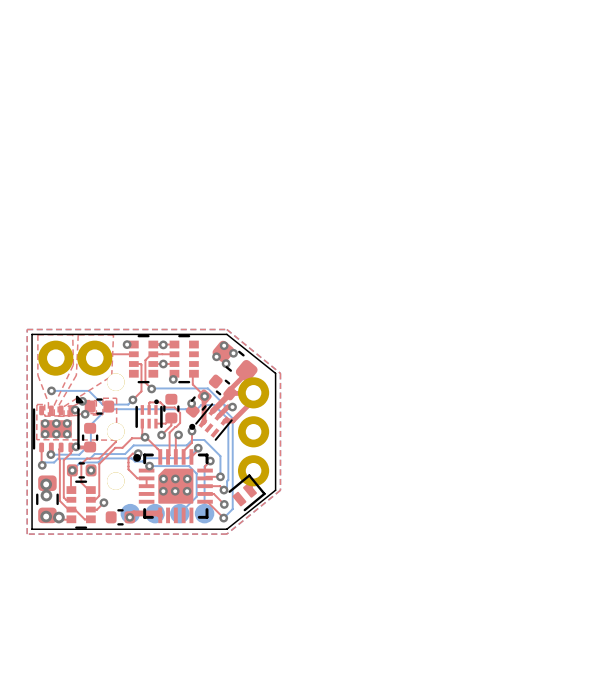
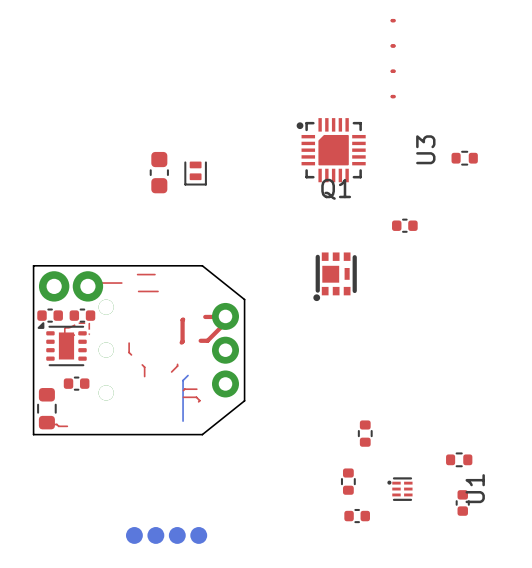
part: none -> (393, 20)
part: none -> (393, 45)
part: none -> (393, 71)
part: none -> (393, 96)
U3: none -> (331, 150)
part: none -> (464, 158)
part: none -> (159, 172)
part: none -> (195, 173)
part: none -> (404, 225)
top zone outline: (27, 329) (226, 329) (280, 373) (280, 490) (226, 534) (27, 534) (27, 329) -> none
top zone outline: (37, 334) (37, 375) (48, 402) (48, 415) (54, 415) (54, 405) (73, 364) (72, 334) (37, 334) -> none
top zone outline: (78, 334) (113, 334) (111, 376) (64, 406) (64, 416) (58, 416) (58, 406) (76, 375) (78, 334) -> none
via: (127, 344) -> none
via: (163, 344) -> none
via: (224, 345) -> none
Q1: none -> (335, 276)
via: (233, 353) -> none
top track: (149, 354) (172, 354) -> none
top track: (151, 354) (145, 360) (145, 382) (151, 388) -> none
via: (216, 356) -> none
part: (143, 359) -> none
part: (184, 359) -> none
part: (235, 361) -> none
via: (226, 363) -> none
top track: (133, 364) (141, 364) (141, 391) (132, 399) -> none
via: (163, 364) -> none
top track: (192, 373) (192, 384) (204, 396) (202, 398) -> none
top track: (245, 374) (230, 389) (230, 393) -> none
via: (173, 379) -> none
part: (222, 387) -> none
bottom track: (151, 388) (207, 388) (224, 405) (224, 410) (232, 418) (232, 509) (223, 518) -> none
via: (151, 388) -> none
bottom track: (51, 390) (88, 390) (102, 404) (128, 404) (132, 399) -> none
via: (51, 390) -> none
top track: (230, 393) (212, 411) -> none
via: (204, 396) -> none
top zone outline: (102, 398) (102, 414) (44, 416) (44, 404) (36, 404) (36, 439) (116, 440) (116, 398) (102, 398) -> none
via: (132, 399) -> none
via: (82, 401) -> none
via: (191, 403) -> none
part: (198, 403) -> none
part position: (99, 406) -> (82, 315)
top track: (232, 407) (227, 407) (218, 415) -> none
via: (232, 407) -> none
part: (171, 408) -> none
via: (75, 409) -> none
top track: (149, 409) (149, 402) (160, 402) (165, 407) (174, 407) (180, 412) (180, 423) (169, 432) (168, 456) -> none
bottom track: (220, 411) (214, 405) (201, 405) (194, 411) (188, 411) (186, 409) (106, 409) (90, 424) (90, 443) (79, 454) (50, 454) -> none
bottom track: (220, 411) (228, 419) (228, 480) (227, 486) (222, 490) -> none
part: (149, 413) -> none
via: (85, 414) -> none
part: (210, 422) -> none
via: (45, 423) -> none
via: (56, 423) -> none
part rotation: 0° (58, 423) -> 90° counterclockwise (62, 344)
via: (67, 423) -> none
top track: (155, 423) (165, 423) (171, 417) (171, 425) (160, 434) -> none
top track: (115, 431) (115, 441) (99, 458) (86, 458) (81, 464) (81, 482) (89, 490) (92, 488) -> none
top track: (192, 431) (192, 442) (183, 451) (182, 461) -> none
via: (192, 431) -> none
via: (45, 434) -> none
via: (56, 434) -> none
via: (67, 434) -> none
top track: (178, 434) (175, 437) (175, 456) -> none
via: (178, 434) -> none
via: (161, 435) -> none
part rotation: 0° (90, 437) -> 90° clockwise (50, 315)
part position: (90, 437) -> (50, 315)
via: (145, 437) -> none
via: (76, 446) -> none
top track: (154, 446) (145, 437) (132, 438) (122, 447) (115, 447) (99, 463) (99, 495) (95, 500) (90, 500) -> none
top track: (41, 447) (42, 465) -> none
top track: (61, 447) (59, 449) (59, 500) (68, 509) (75, 509) -> none
top track: (73, 447) (90, 447) (70, 447) (70, 453) (63, 460) (63, 497) (66, 500) (71, 500) -> none
part: (156, 447) -> none
bottom track: (198, 448) (188, 458) (146, 458) (142, 461) (134, 461) (131, 458) (102, 458) (98, 462) (80, 462) (72, 470) -> none
via: (198, 448) -> none
top track: (138, 453) (132, 453) (128, 457) (128, 462) -> none
via: (138, 453) -> none
via: (50, 454) -> none
top track: (210, 461) (205, 466) (205, 470) -> none
via: (210, 461) -> none
part: (128, 464) -> none
bottom track: (42, 465) (45, 462) (54, 462) (57, 458) (90, 458) (94, 454) (125, 454) (133, 445) (186, 445) (192, 439) (204, 439) (220, 456) (220, 476) -> none
via: (42, 465) -> none
top track: (128, 466) (128, 469) (137, 478) (146, 478) (146, 486) -> none
bottom track: (149, 466) (189, 466) (196, 473) (196, 496) (179, 513) (174, 513) -> none
via: (149, 466) -> none
top track: (72, 470) (71, 490) -> none
via: (72, 470) -> none
via: (91, 470) -> none
via: (220, 476) -> none
via: (163, 478) -> none
via: (175, 478) -> none
via: (187, 478) -> none
via: (46, 484) -> none
part: (173, 486) -> none
via: (223, 490) -> none
via: (163, 491) -> none
via: (175, 491) -> none
via: (187, 491) -> none
part: (247, 492) -> none
top track: (205, 493) (213, 493) (224, 504) -> none
via: (46, 495) -> none
top track: (205, 501) (207, 501) (222, 519) -> none
top track: (103, 502) (94, 509) -> none
via: (103, 502) -> none
part: (81, 504) -> none
via: (224, 504) -> none
top track: (75, 509) (84, 519) (89, 519) -> none
part position: (167, 513) -> (166, 535)
top track: (160, 515) (158, 513) (133, 513) (129, 517) (132, 520) -> none
via: (46, 516) -> none
via: (58, 517) -> none
part: (120, 517) -> none
via: (129, 517) -> none
via: (223, 518) -> none
part: none -> (365, 433)
part: none -> (459, 459)
part: none -> (348, 481)
U1: none -> (399, 489)
part: none -> (462, 502)
part: none -> (357, 516)

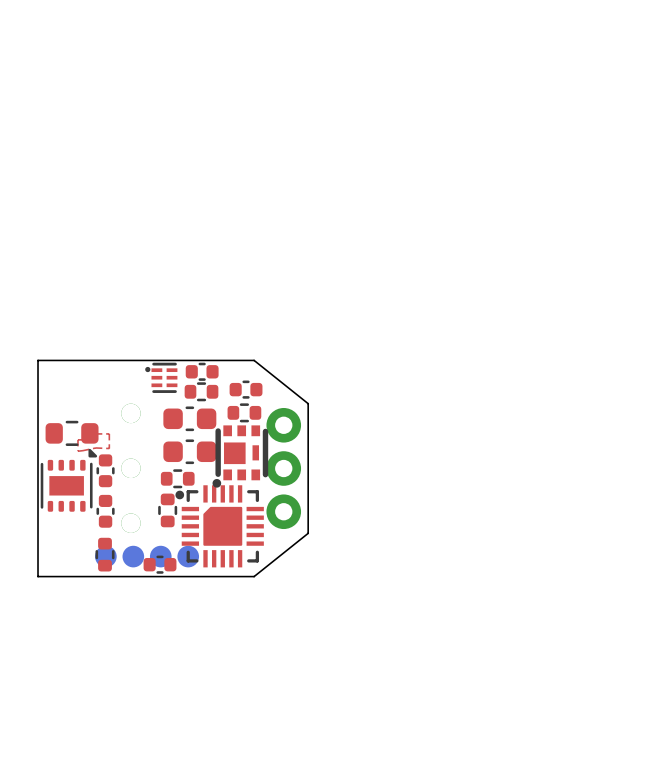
part: (393, 20) -> none
part: (393, 45) -> none
part: (393, 71) -> none
part: (393, 96) -> none
U3: (331, 150) -> none
part: (464, 158) -> none
part: (159, 172) -> none
part: (195, 173) -> none
part: (404, 225) -> none
top track: (137, 274) (154, 274) -> none
part: none -> (202, 371)
Q1: (335, 276) -> none
part: none -> (161, 377)
top track: (121, 283) (90, 283) (87, 285) -> none
part: (71, 286) -> none
part: none -> (246, 389)
part: none -> (201, 391)
top track: (138, 291) (158, 291) -> none
part: none -> (244, 412)
part: none -> (189, 418)
part: (50, 315) -> none
part: (82, 315) -> none
top track: (205, 316) (227, 316) (227, 320) (207, 340) (200, 340) -> none
top track: (183, 319) (181, 342) -> none
part: none -> (189, 451)
part: none -> (240, 456)
top track: (129, 343) (129, 352) (131, 354) -> none
part rotation: 0° (62, 344) -> 90° clockwise (68, 480)
part: none -> (105, 470)
part: none -> (177, 478)
top track: (142, 364) (144, 367) (144, 376) -> none
top track: (177, 364) (171, 371) -> none
bottom track: (188, 375) (183, 380) (183, 421) -> none
part: none -> (167, 510)
part rotation: 0° (76, 383) -> 90° clockwise (105, 511)
top track: (196, 389) (183, 390) -> none
part: none -> (219, 526)
top track: (183, 397) (196, 397) (199, 400) (198, 401) -> none
part rotation: 0° (46, 408) -> 90° clockwise (72, 433)
part position: (46, 408) -> (72, 433)
part: none -> (105, 554)
top track: (46, 424) (67, 426) -> none
part: none -> (160, 564)
part: (365, 433) -> none
part: (459, 459) -> none
part: (348, 481) -> none
U1: (399, 489) -> none
part: (462, 502) -> none
part: (357, 516) -> none
part position: (166, 535) -> (147, 556)

